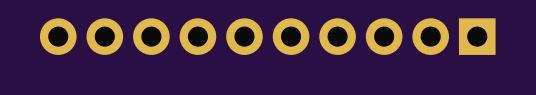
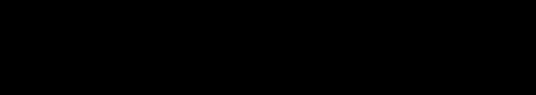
part: (267, 36) -> none

